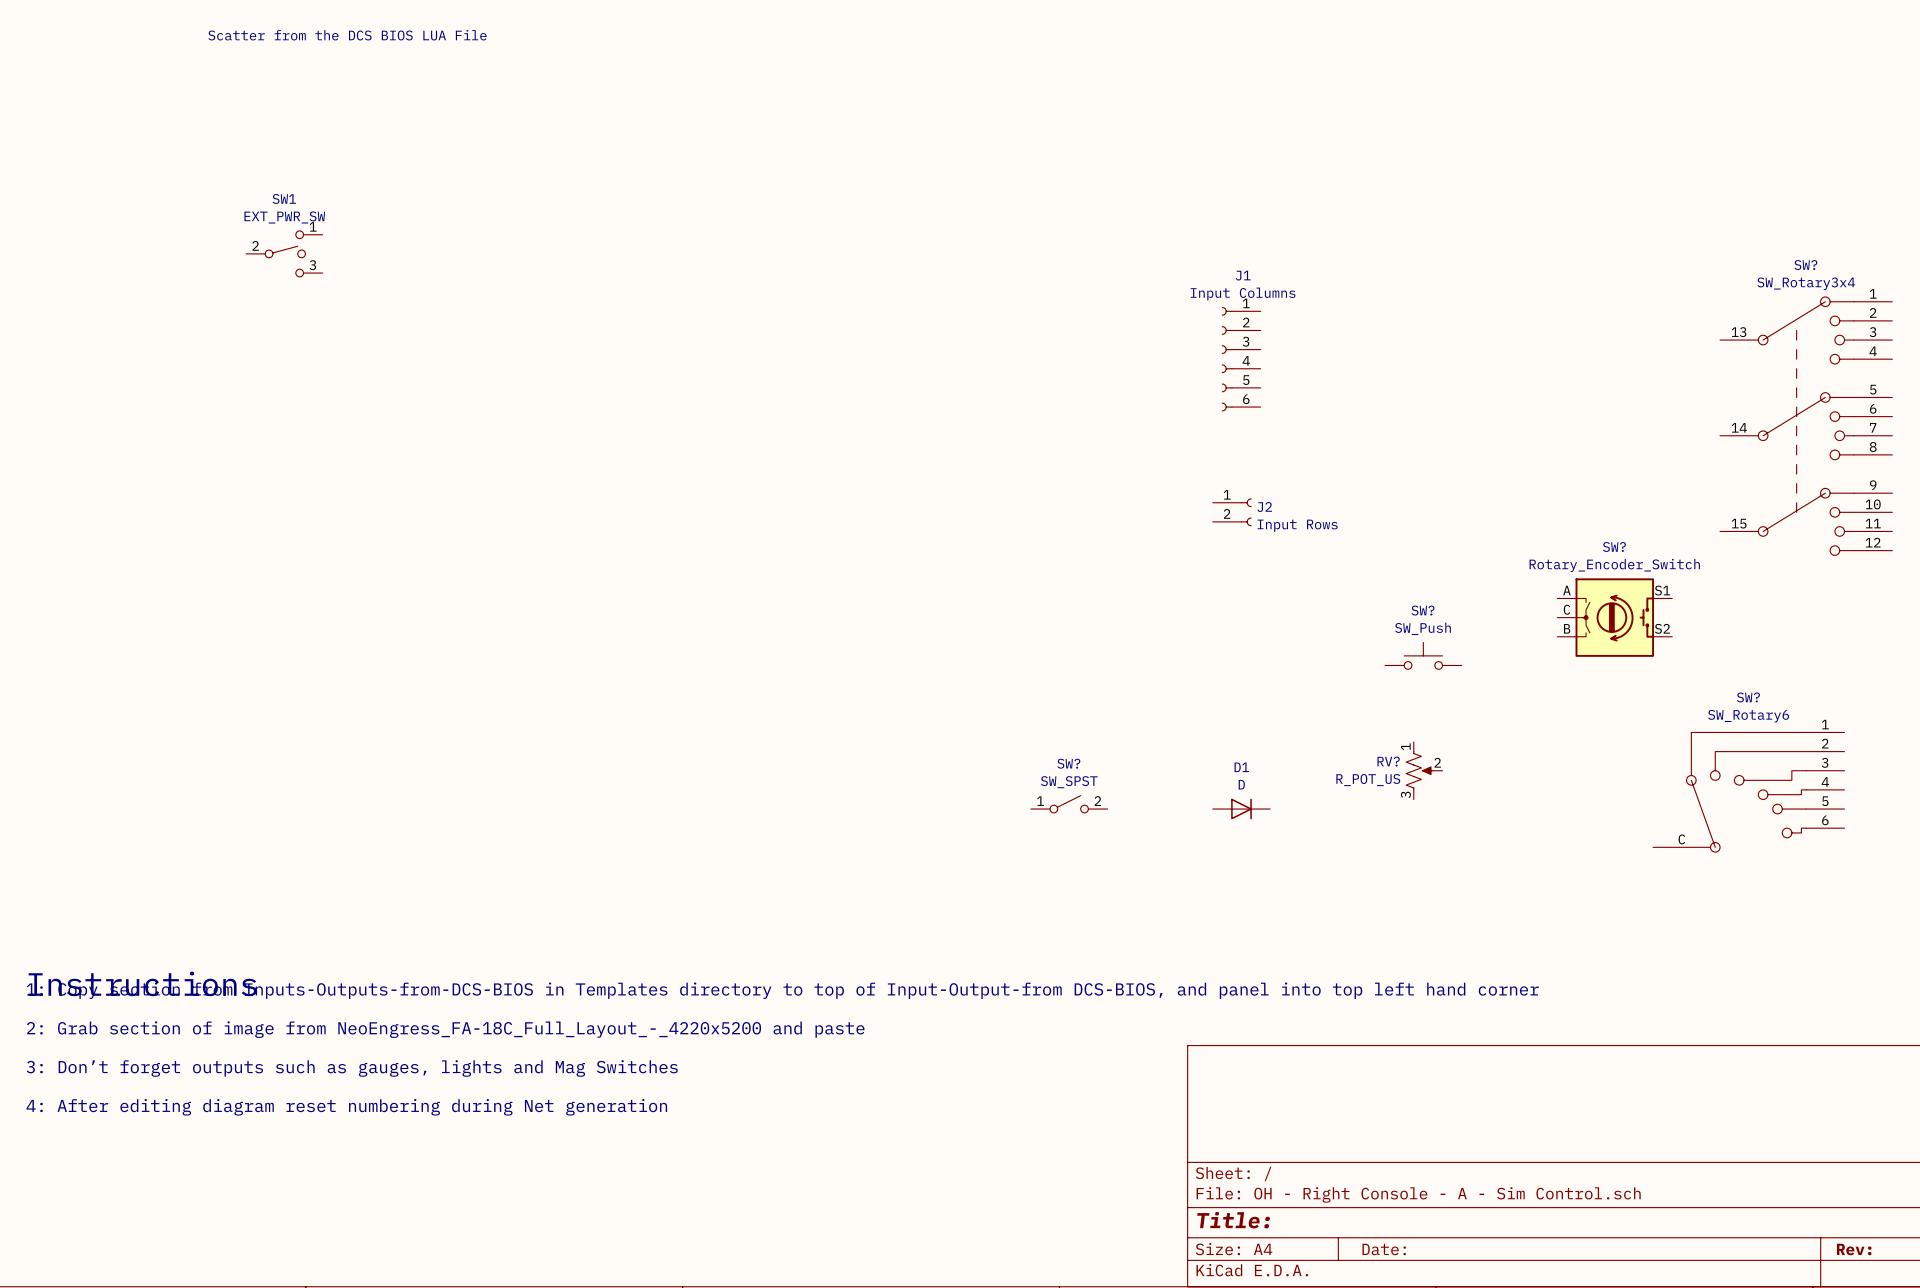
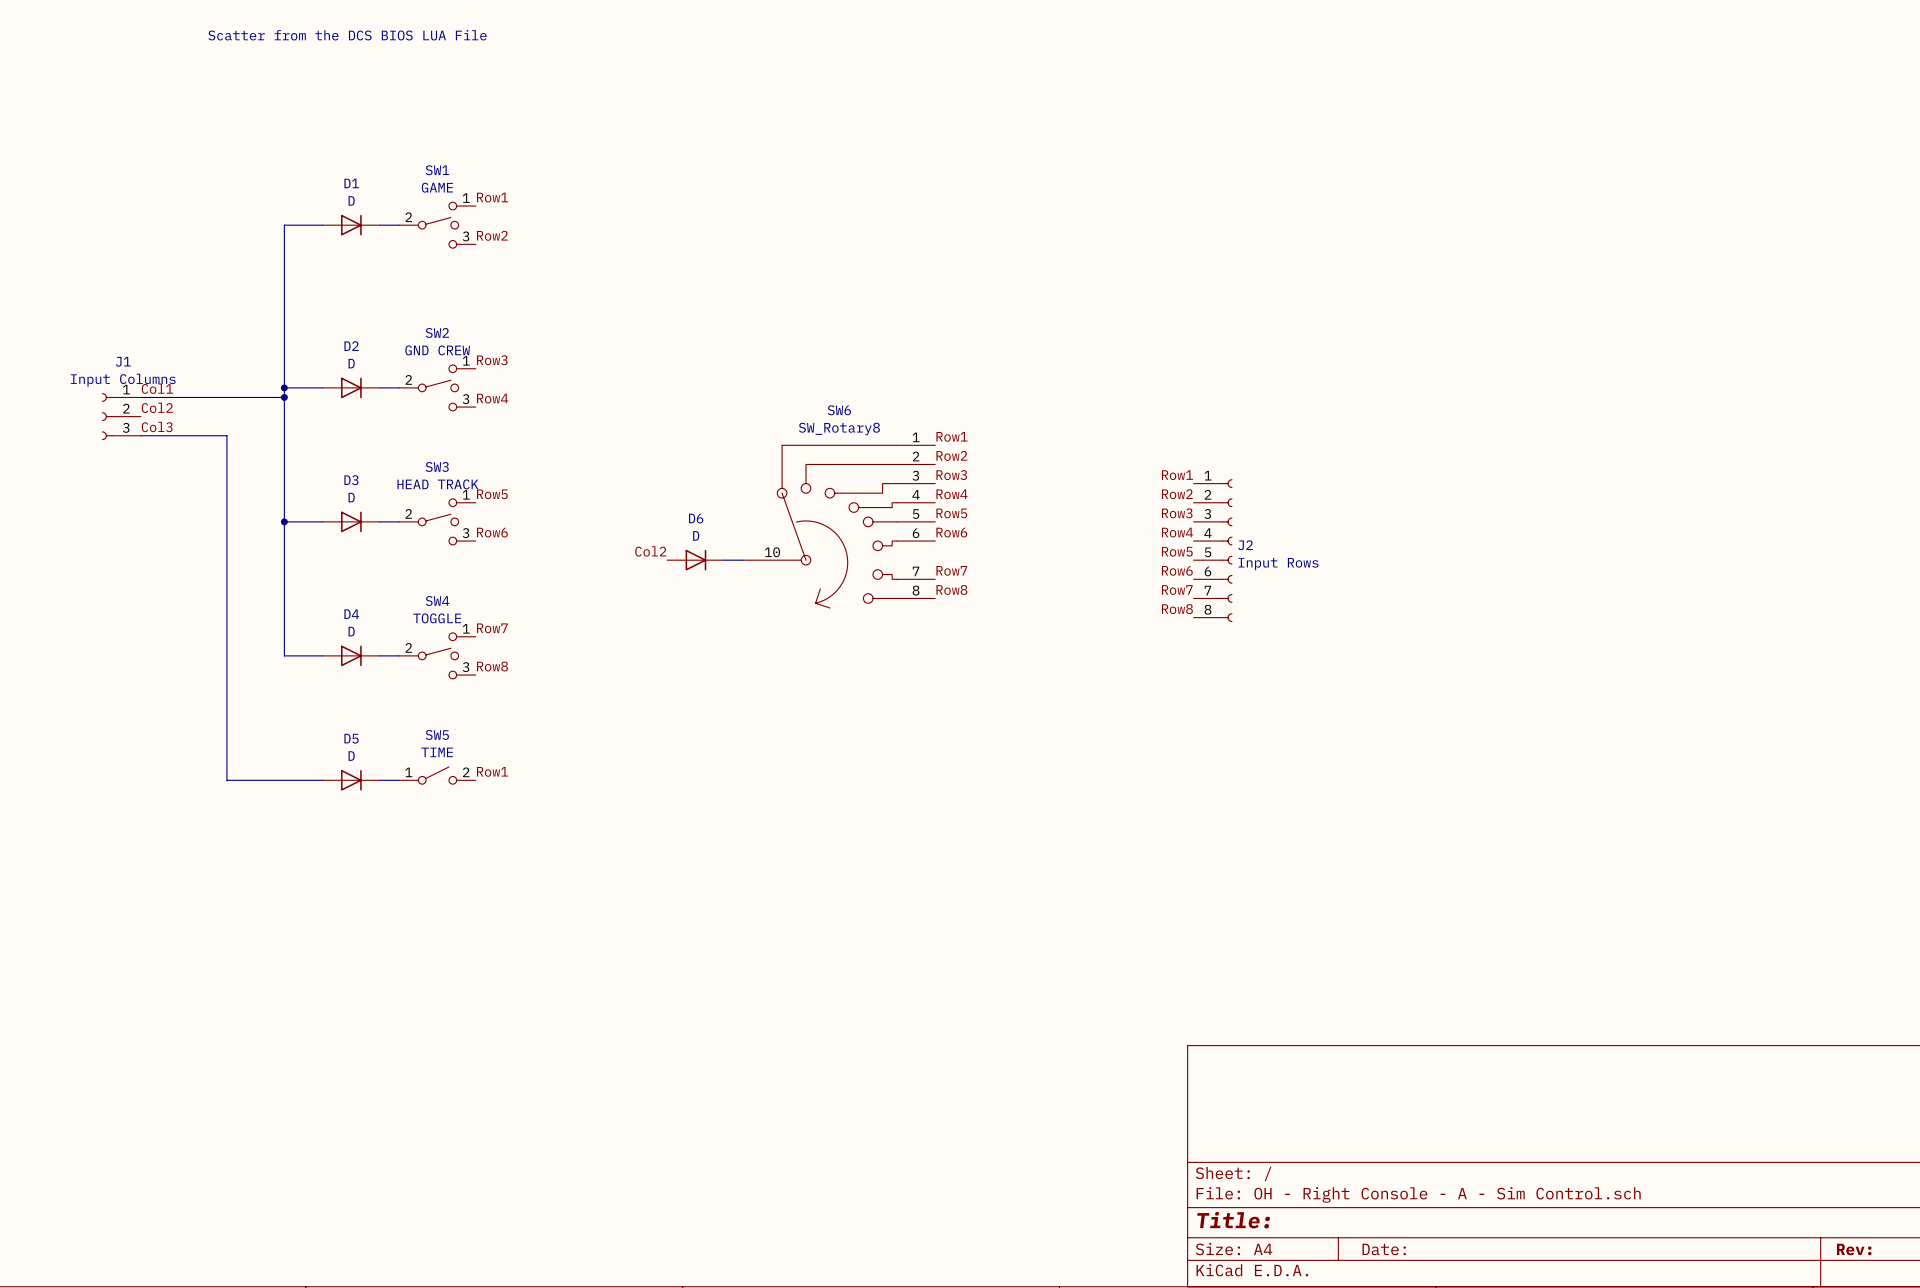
label: none -> Row1 (492, 197)
SW1 value: EXT_PWR_SW (284, 217) -> GAME (437, 187)
wire: none -> (322, 225) (284, 225) (284, 655) (322, 655)
wire: none -> (380, 225) (399, 225)
label: none -> Row2 (492, 235)
SW1 position: (284, 253) -> (437, 225)
J1 name position: J1 (1243, 275) -> J1 (123, 361)
J1 value position: Input Columns (1243, 294) -> Input Columns (123, 380)
J1 symbol: [1221, 306, 1261, 412] -> [101, 393, 141, 441]
label: none -> Row3 (492, 360)
wire: none -> (284, 387) (322, 387)
junction: none -> (284, 387)
D2: none -> D (351, 387)
wire: none -> (380, 387) (399, 387)
SW2: none -> GND CREW (437, 387)
label: none -> Col1 (157, 388)
wire: none -> (140, 397) (284, 397)
junction: none -> (284, 397)
label: none -> Row4 (492, 398)
label: none -> Col2 (157, 407)
SW?: SW_Rotary3x4 (1806, 426) -> none
label: none -> Col3 (157, 427)
wire: none -> (140, 435) (226, 435) (226, 780) (322, 780)
label: none -> Row1 (951, 436)
label: none -> Row2 (951, 455)
label: none -> Row3 (951, 475)
label: none -> Row1 (1177, 475)
label: none -> Row5 (492, 494)
label: none -> Row4 (952, 494)
label: none -> Row2 (1177, 494)
J2 symbol: [1212, 498, 1252, 527] -> [1193, 479, 1233, 623]
label: none -> Row5 (951, 513)
label: none -> Row3 (1177, 513)
wire: none -> (284, 521) (322, 521)
junction: none -> (284, 521)
D3: none -> D (351, 521)
wire: none -> (380, 521) (399, 521)
SW3: none -> HEAD TRACK (437, 521)
SW6: none -> SW_Rotary8 (839, 526)
label: none -> Row6 (492, 532)
label: none -> Row6 (951, 532)
label: none -> Row4 (1177, 532)
label: none -> Col2 (650, 551)
label: none -> Row5 (1177, 551)
D6: none -> D (695, 560)
wire: none -> (724, 560) (743, 560)
label: none -> Row7 (951, 570)
label: none -> Row6 (1177, 570)
label: none -> Row8 (951, 589)
label: none -> Row7 (1177, 590)
label: none -> Row8 (1177, 609)
SW?: Rotary_Encoder_Switch (1614, 617) -> none
label: none -> Row7 (492, 628)
D4: none -> D (351, 655)
wire: none -> (380, 655) (399, 655)
SW4: none -> TOGGLE (437, 655)
SW?: SW_Push (1423, 655) -> none
label: none -> Row8 (492, 666)
RV?: R_POT_US (1424, 770) -> none
label: none -> Row1 (492, 771)
SW5: none -> TIME (437, 775)
D5: none -> D (351, 780)
wire: none -> (380, 780) (399, 780)
SW?: SW_Rotary6 (1748, 792) -> none
SW?: SW_SPST (1069, 804) -> none
D1 position: (1241, 809) -> (351, 225)
text: Instructions (142, 983) -> none
text: 1: Copy section from Inputs-Outputs-from-DCS-BIOS in Templates directory to top of Input-Output-from DCS-BIOS, and panel into top left hand corner (782, 990) -> none
text: 2: Grab section of image from NeoEngress_FA-18C_Full_Layout_-_4220x5200 and paste (445, 1029) -> none
text: 3: Don’t forget outputs such as gauges, lights and Mag Switches (352, 1068) -> none
text: 4: After editing diagram reset numbering during Net generation (346, 1107) -> none

